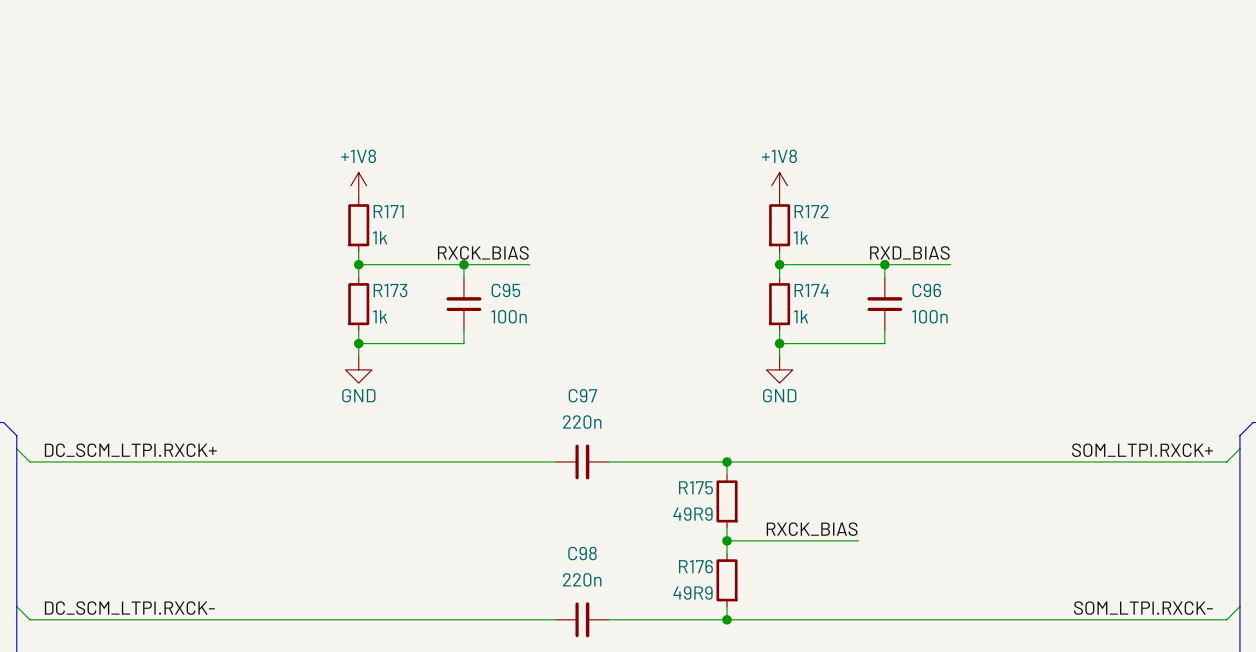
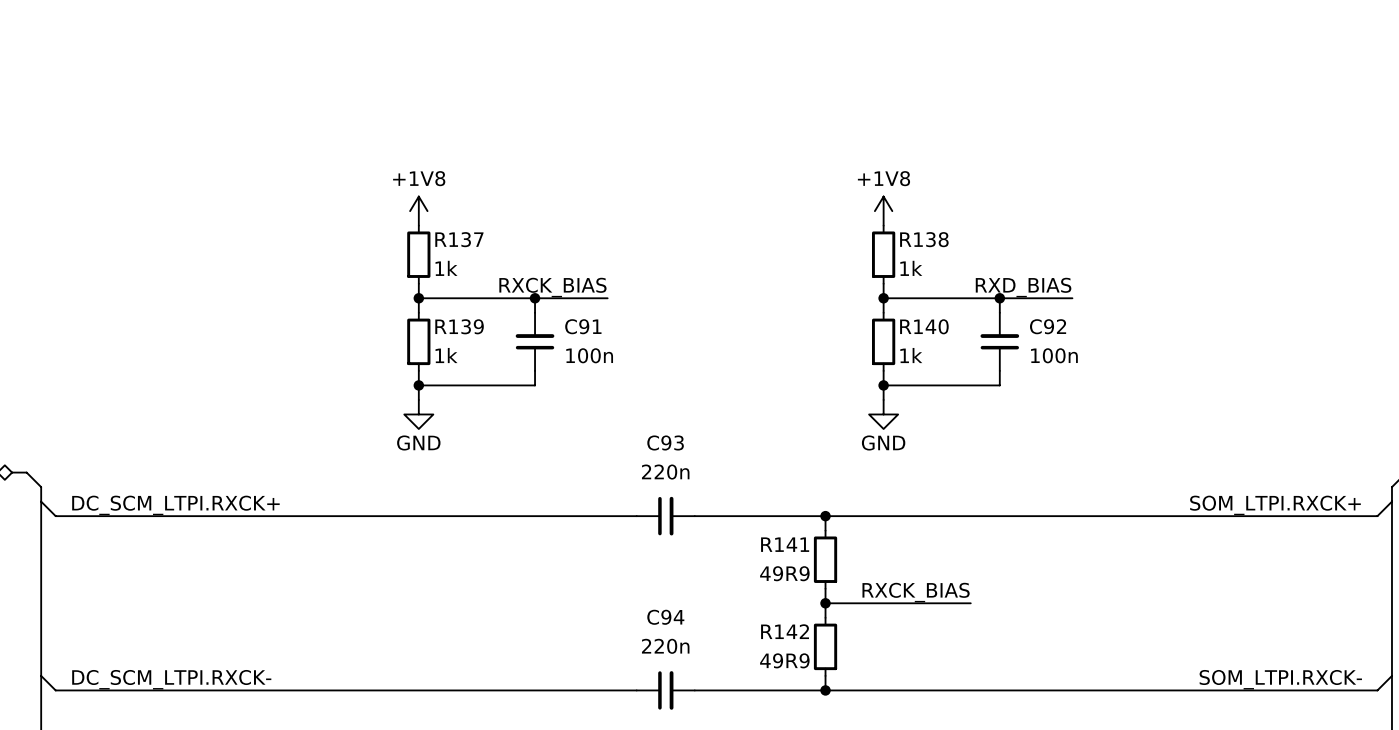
R171 name: R171 (388, 211) -> R137 (459, 239)
R172 name: R172 (811, 211) -> R138 (924, 239)
R173 name: R173 (390, 290) -> R139 (459, 326)
C95 name: C95 (505, 290) -> C91 (583, 326)
R174 name: R174 (811, 290) -> R140 (924, 326)
C96 name: C96 (926, 290) -> C92 (1048, 326)
C97 name: C97 (582, 395) -> C93 (665, 442)
R175 name: R175 (695, 487) -> R141 (785, 544)
C98 name: C98 (582, 553) -> C94 (665, 617)
R176 name: R176 (695, 566) -> R142 (785, 631)

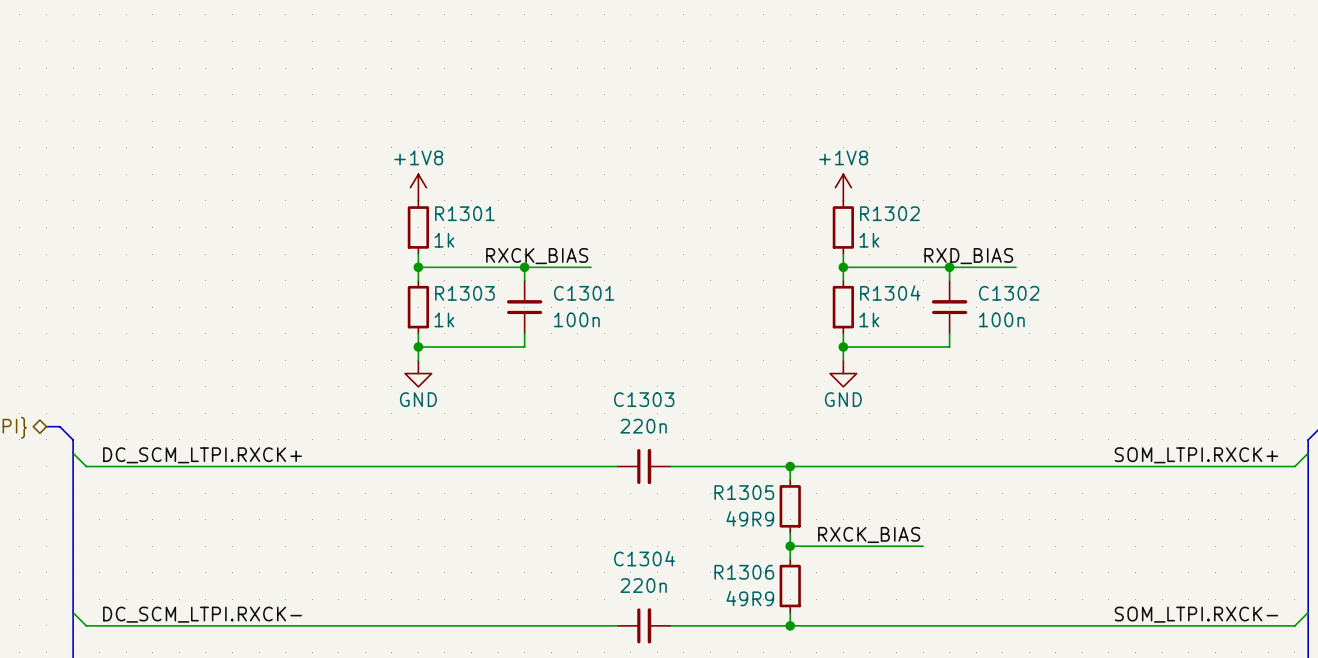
R137 name: R137 (459, 239) -> R1301 (464, 213)
R138 name: R138 (924, 239) -> R1302 (889, 213)
R139 name: R139 (459, 326) -> R1303 (464, 293)
C91 name: C91 (583, 326) -> C1301 (584, 293)
R140 name: R140 (924, 326) -> R1304 (890, 293)
C92 name: C92 (1048, 326) -> C1302 (1009, 293)
C93 name: C93 (665, 442) -> C1303 (644, 399)
R141 name: R141 (785, 544) -> R1305 (744, 492)
C94 name: C94 (665, 617) -> C1304 (644, 558)
R142 name: R142 (785, 631) -> R1306 (744, 572)

